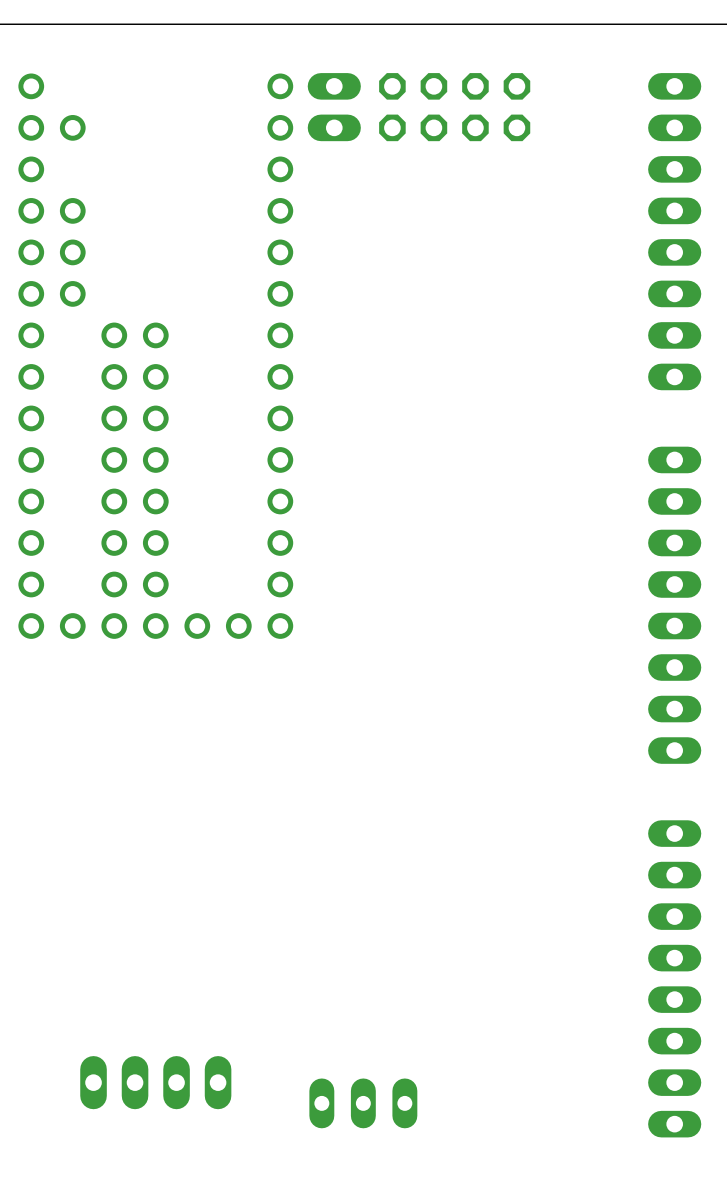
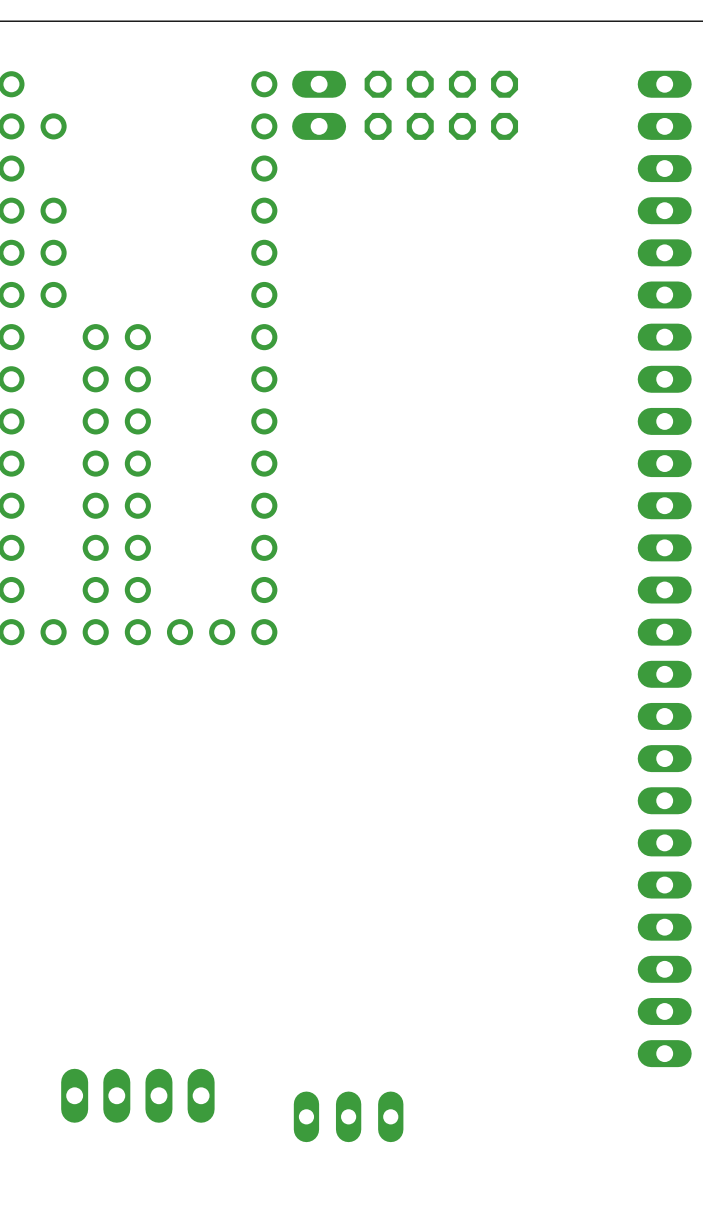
part position: (674, 605) -> (664, 568)
part position: (674, 978) -> (664, 906)

